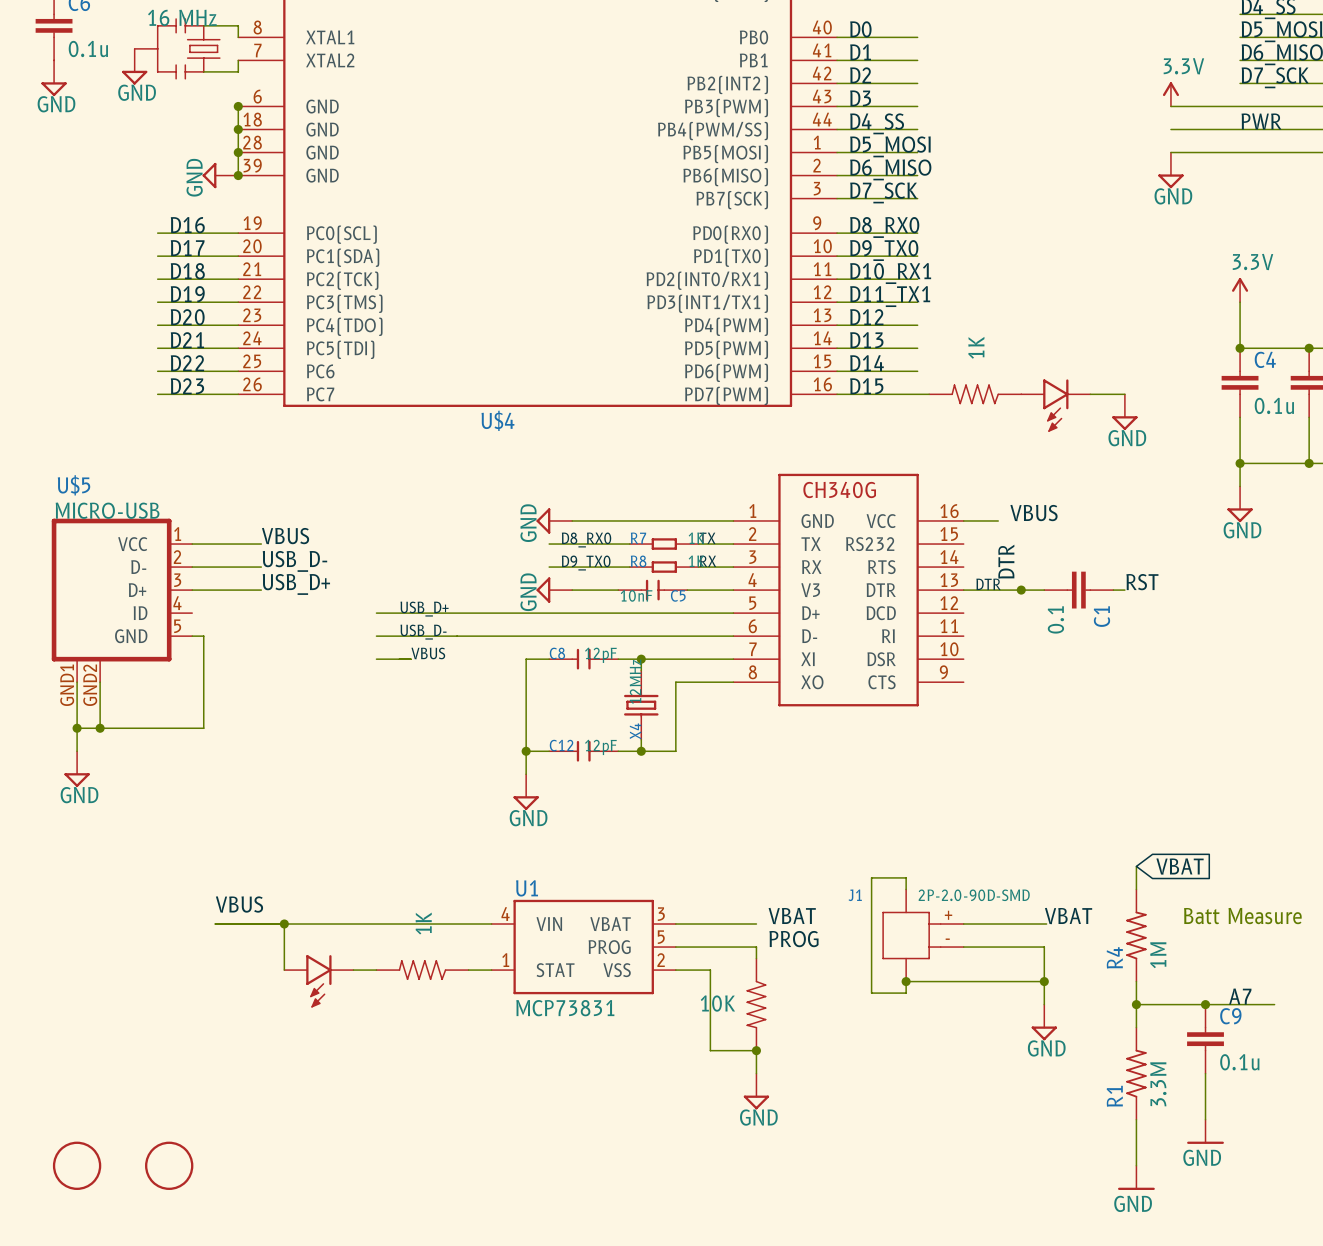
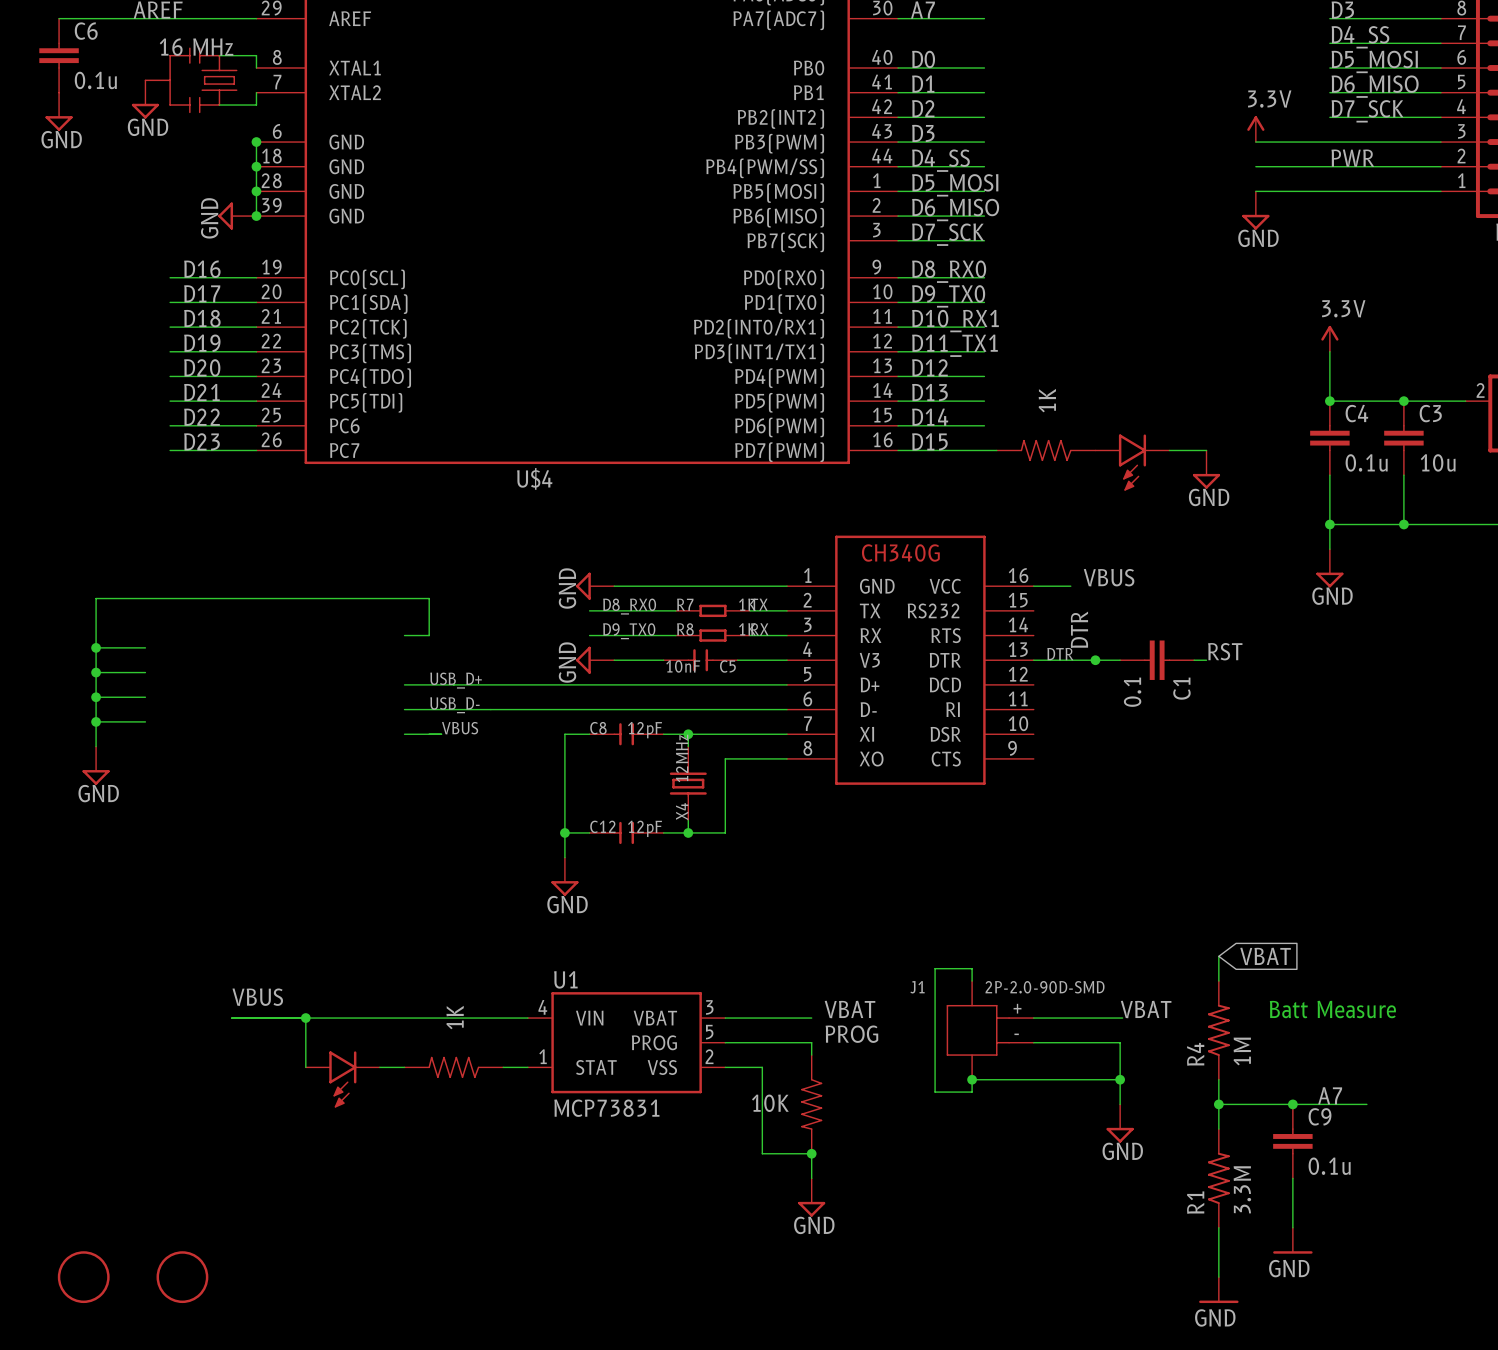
label: VBUS (285, 536) -> none
wire: (192, 544) (261, 544) -> none
label: USB_D- (294, 561) -> none
wire: (192, 567) (261, 567) -> none
wire: none -> (404, 635) (429, 635) (429, 598) (96, 598) (96, 746)
wire: none -> (96, 647) (145, 647)
junction: none -> (96, 647)
label: USB_D+ (296, 584) -> none
wire: (192, 590) (261, 590) -> none
U$5: MICRO-USB (121, 600) -> none
wire: none -> (96, 672) (145, 672)
junction: none -> (96, 672)
wire: none -> (96, 697) (145, 697)
junction: none -> (96, 697)
wire: (192, 636) (203, 636) (203, 728) (77, 728) -> none
wire: none -> (96, 721) (145, 721)
junction: none -> (96, 721)
wire: (77, 682) (77, 751) -> none
wire: (100, 682) (100, 728) -> none
junction: (77, 728) -> none
junction: (100, 728) -> none
power symbol position: GND (77, 769) -> GND (96, 765)

